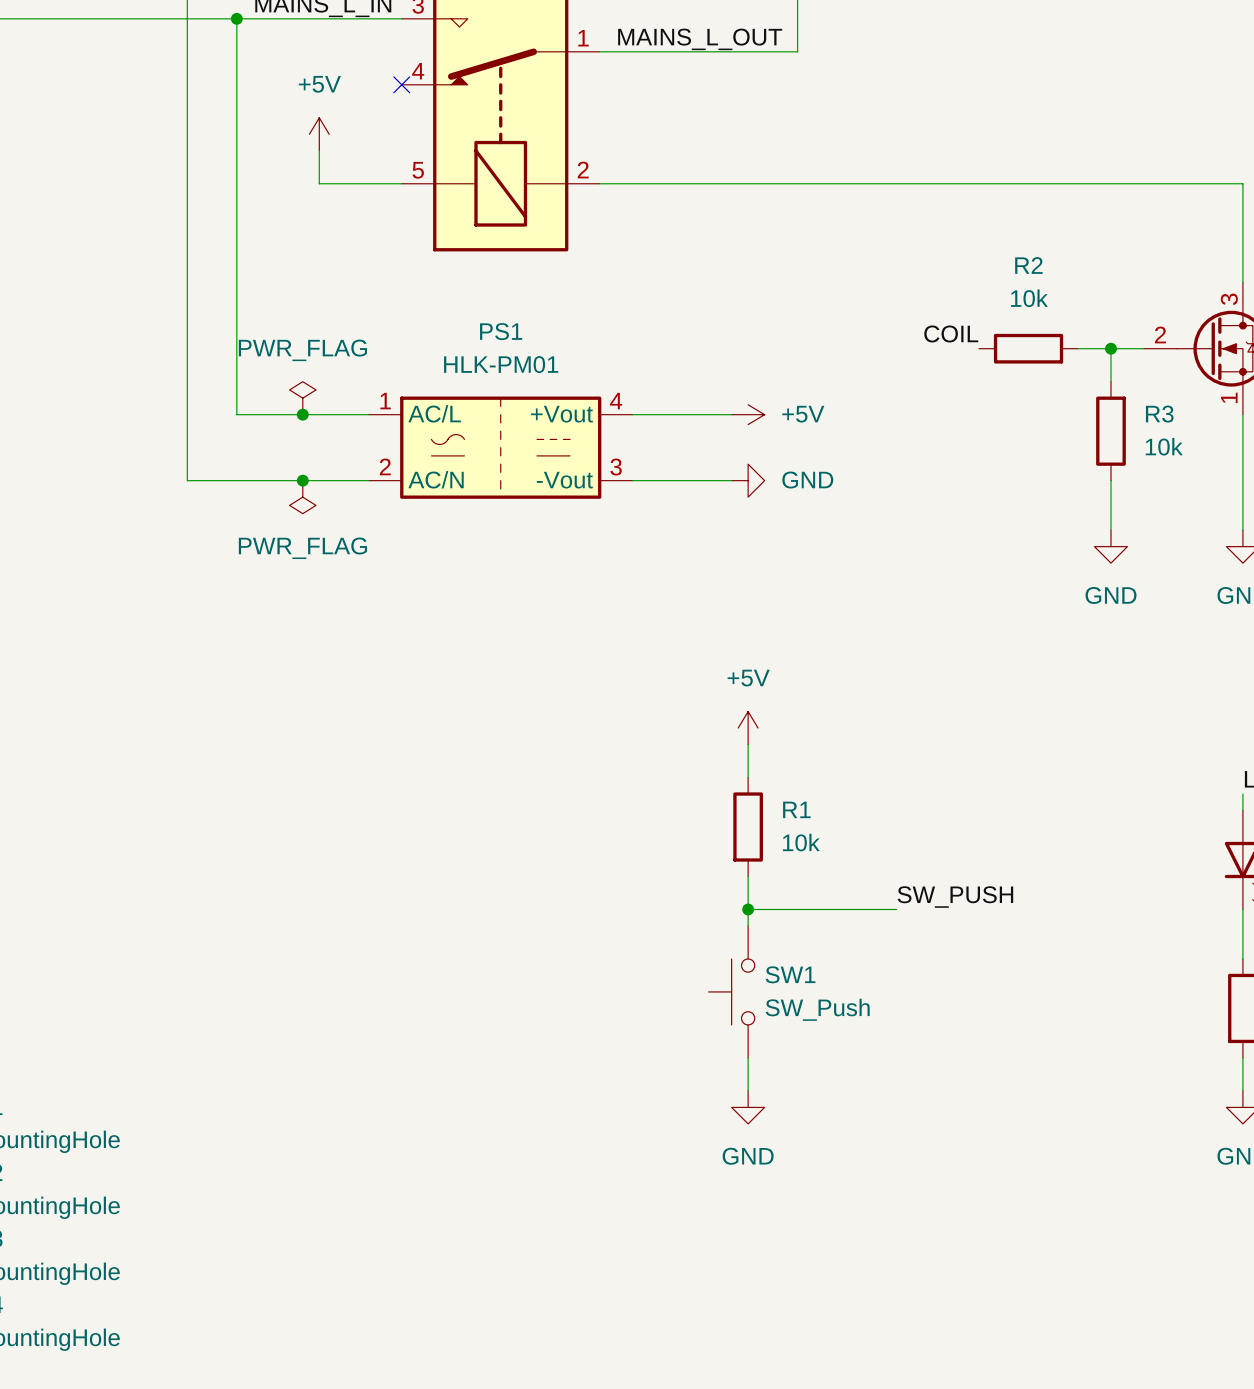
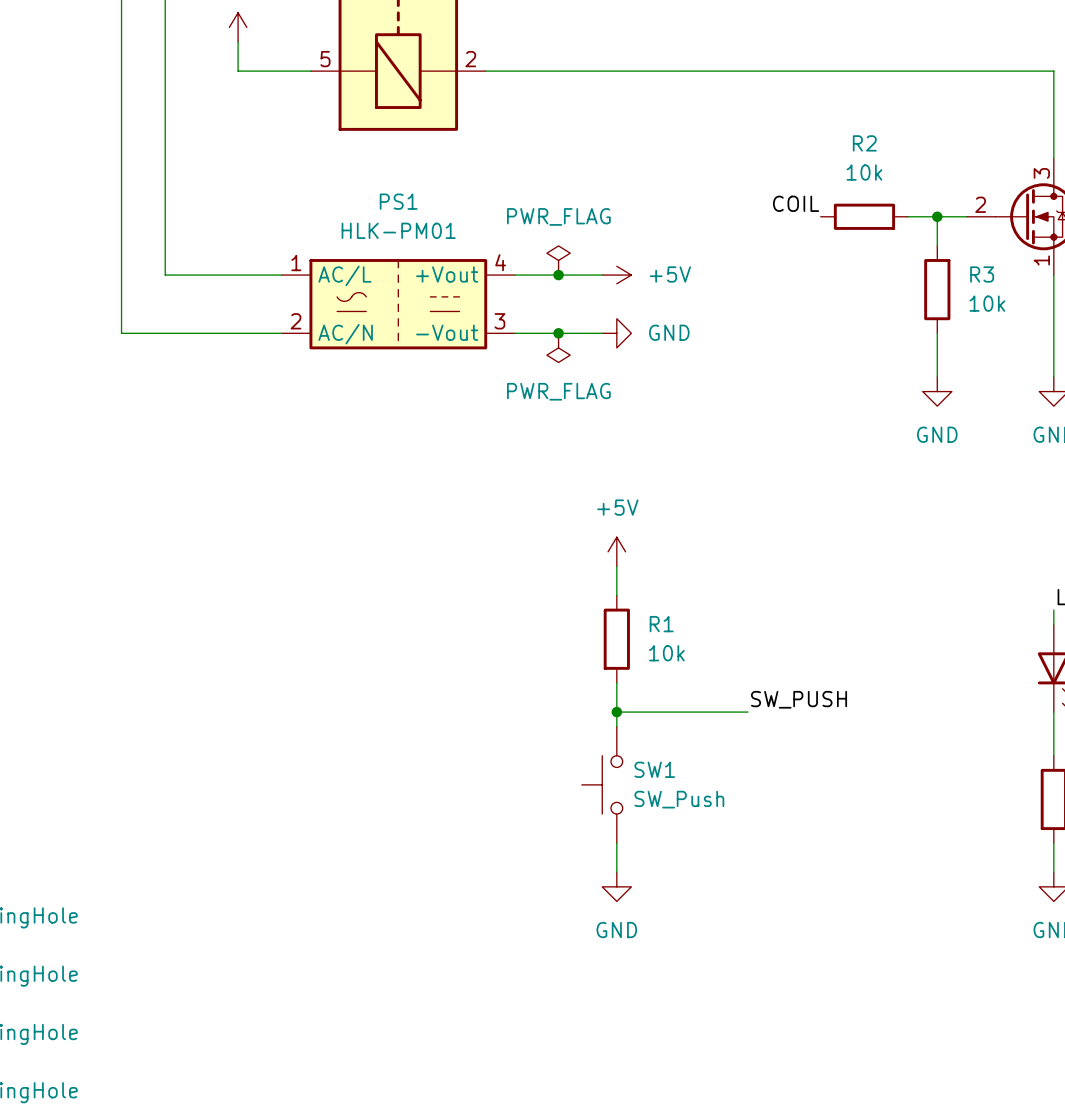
power symbol: PWR_FLAG (302, 398) -> none
power symbol: none -> PWR_FLAG (558, 260)
junction: (302, 414) -> none
junction: none -> (558, 275)
junction: (302, 480) -> none
junction: none -> (558, 333)
power symbol: PWR_FLAG (302, 497) -> none
power symbol: none -> PWR_FLAG (558, 347)

